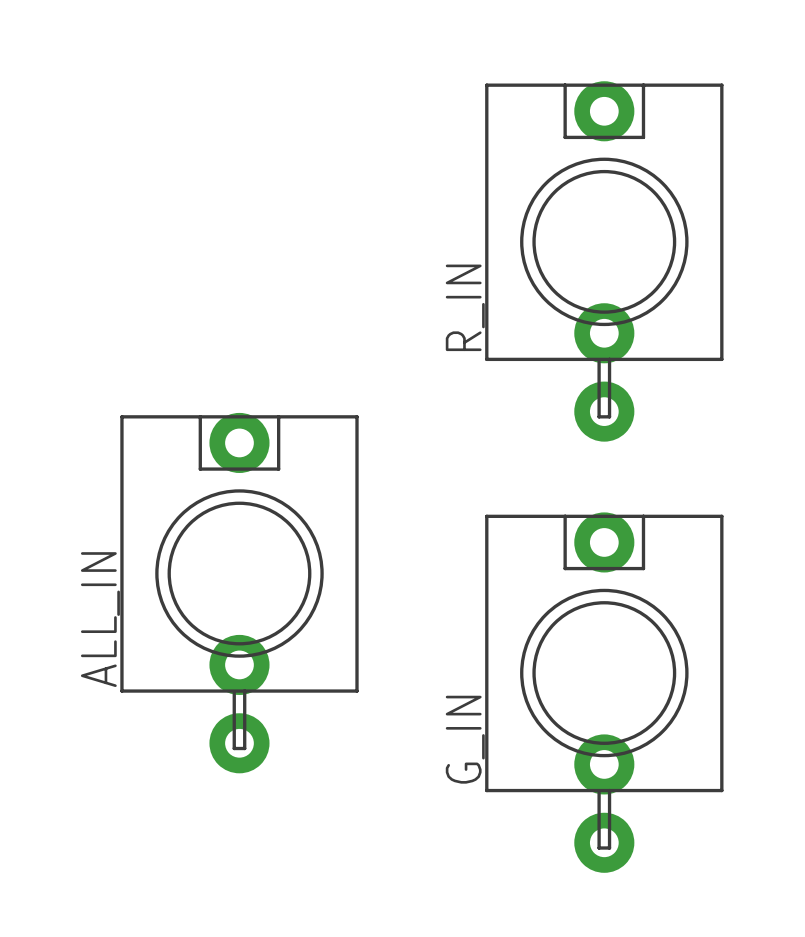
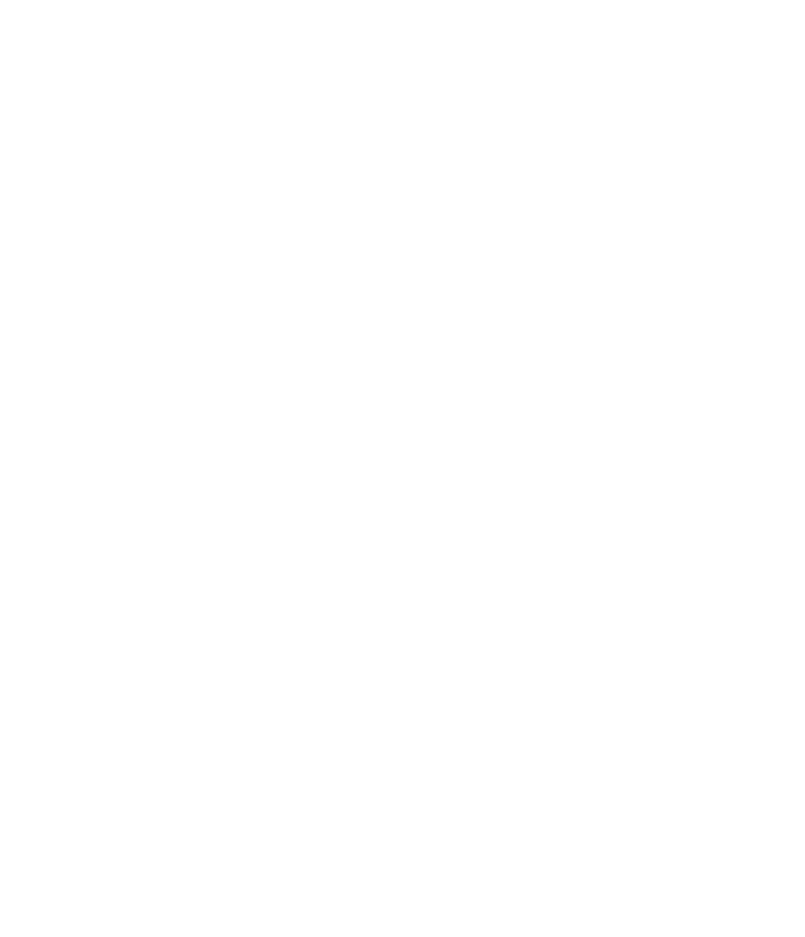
R_IN: (604, 261) -> none
ALL_IN: (239, 593) -> none
G_IN: (604, 692) -> none

